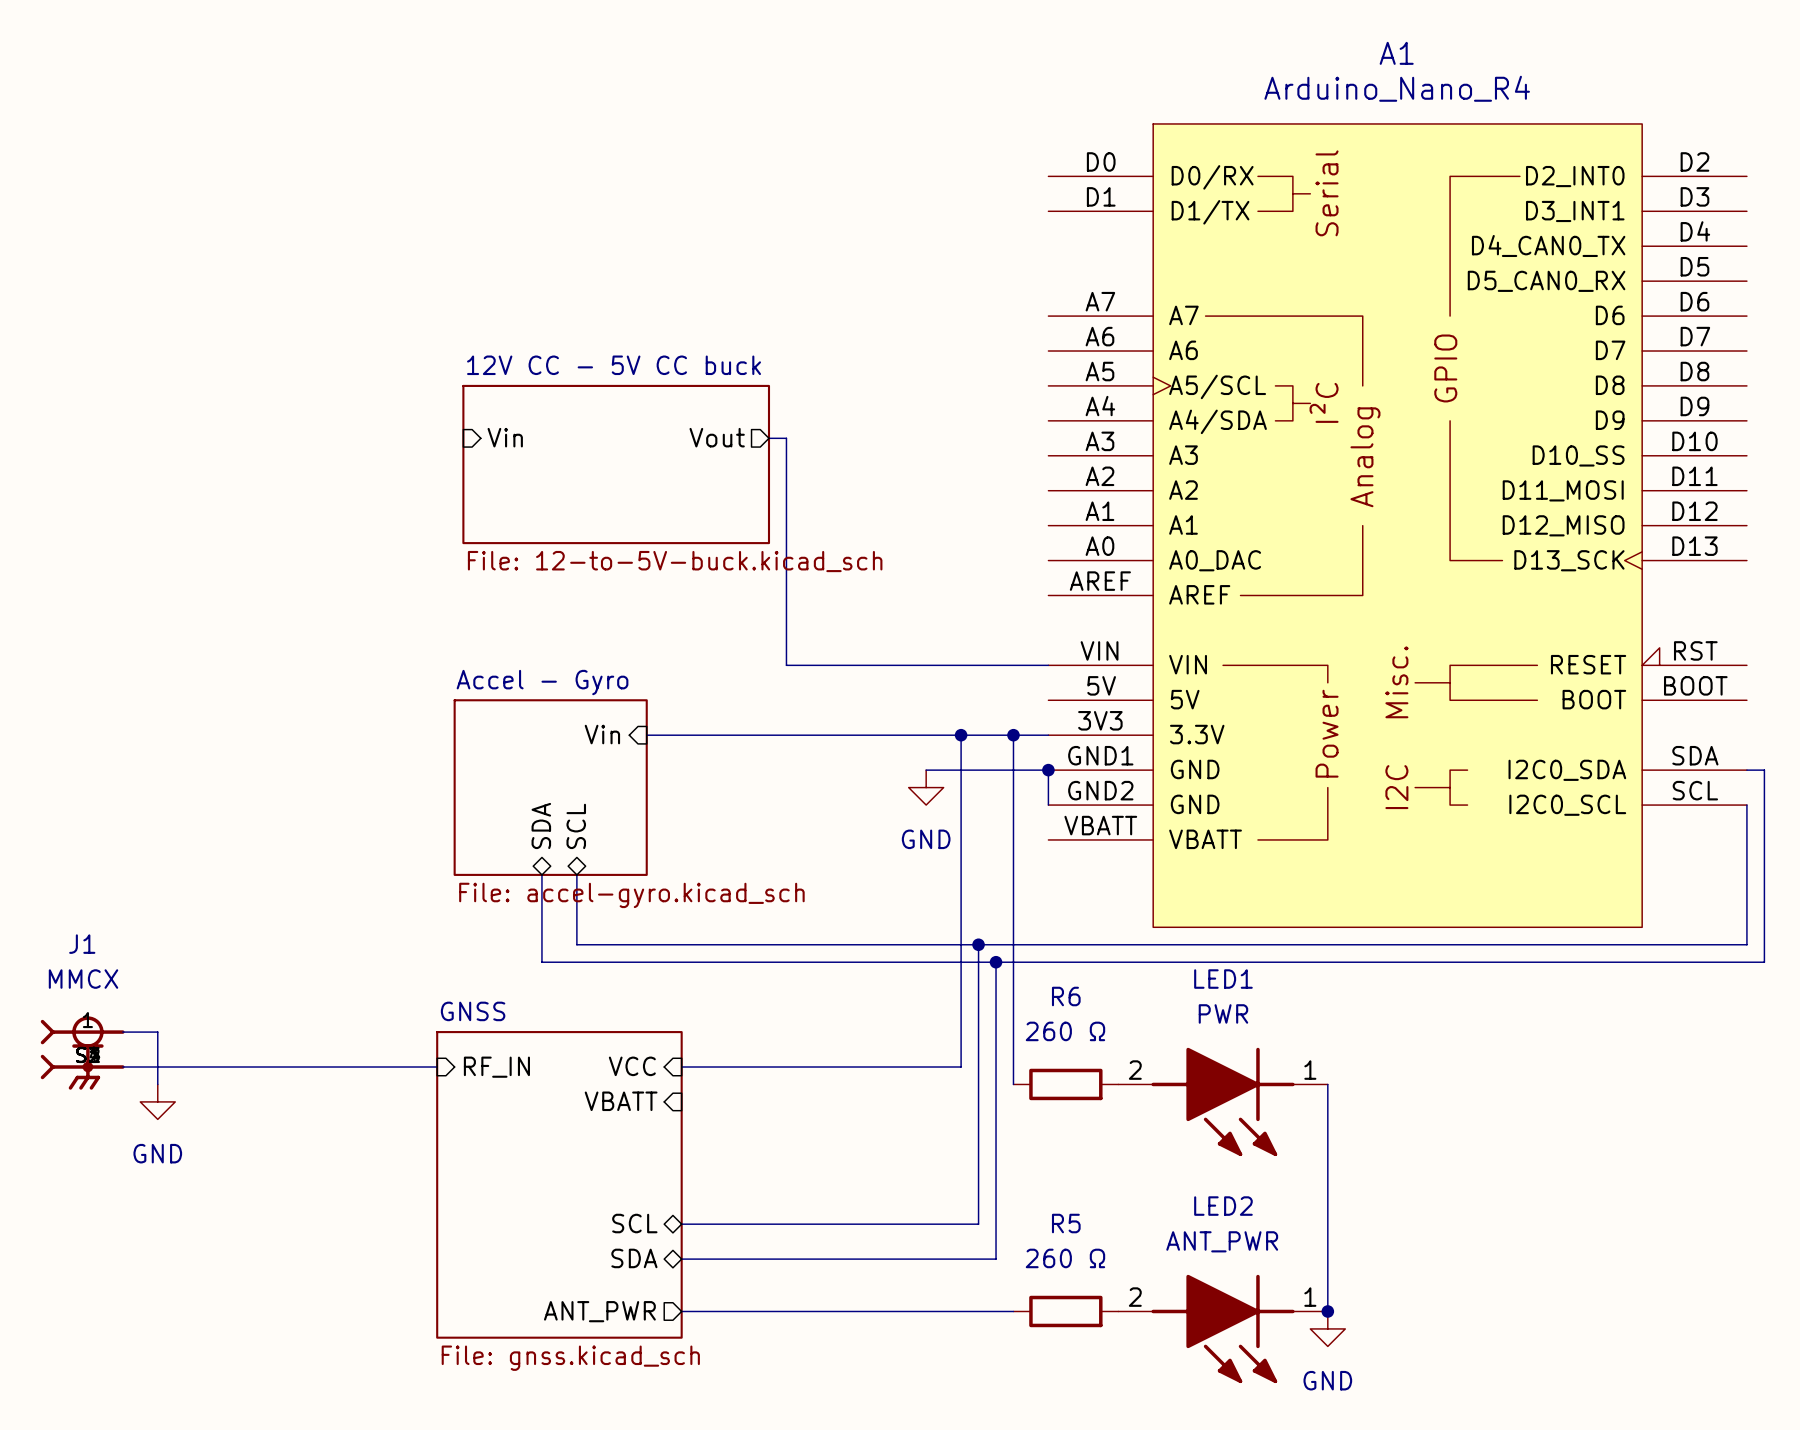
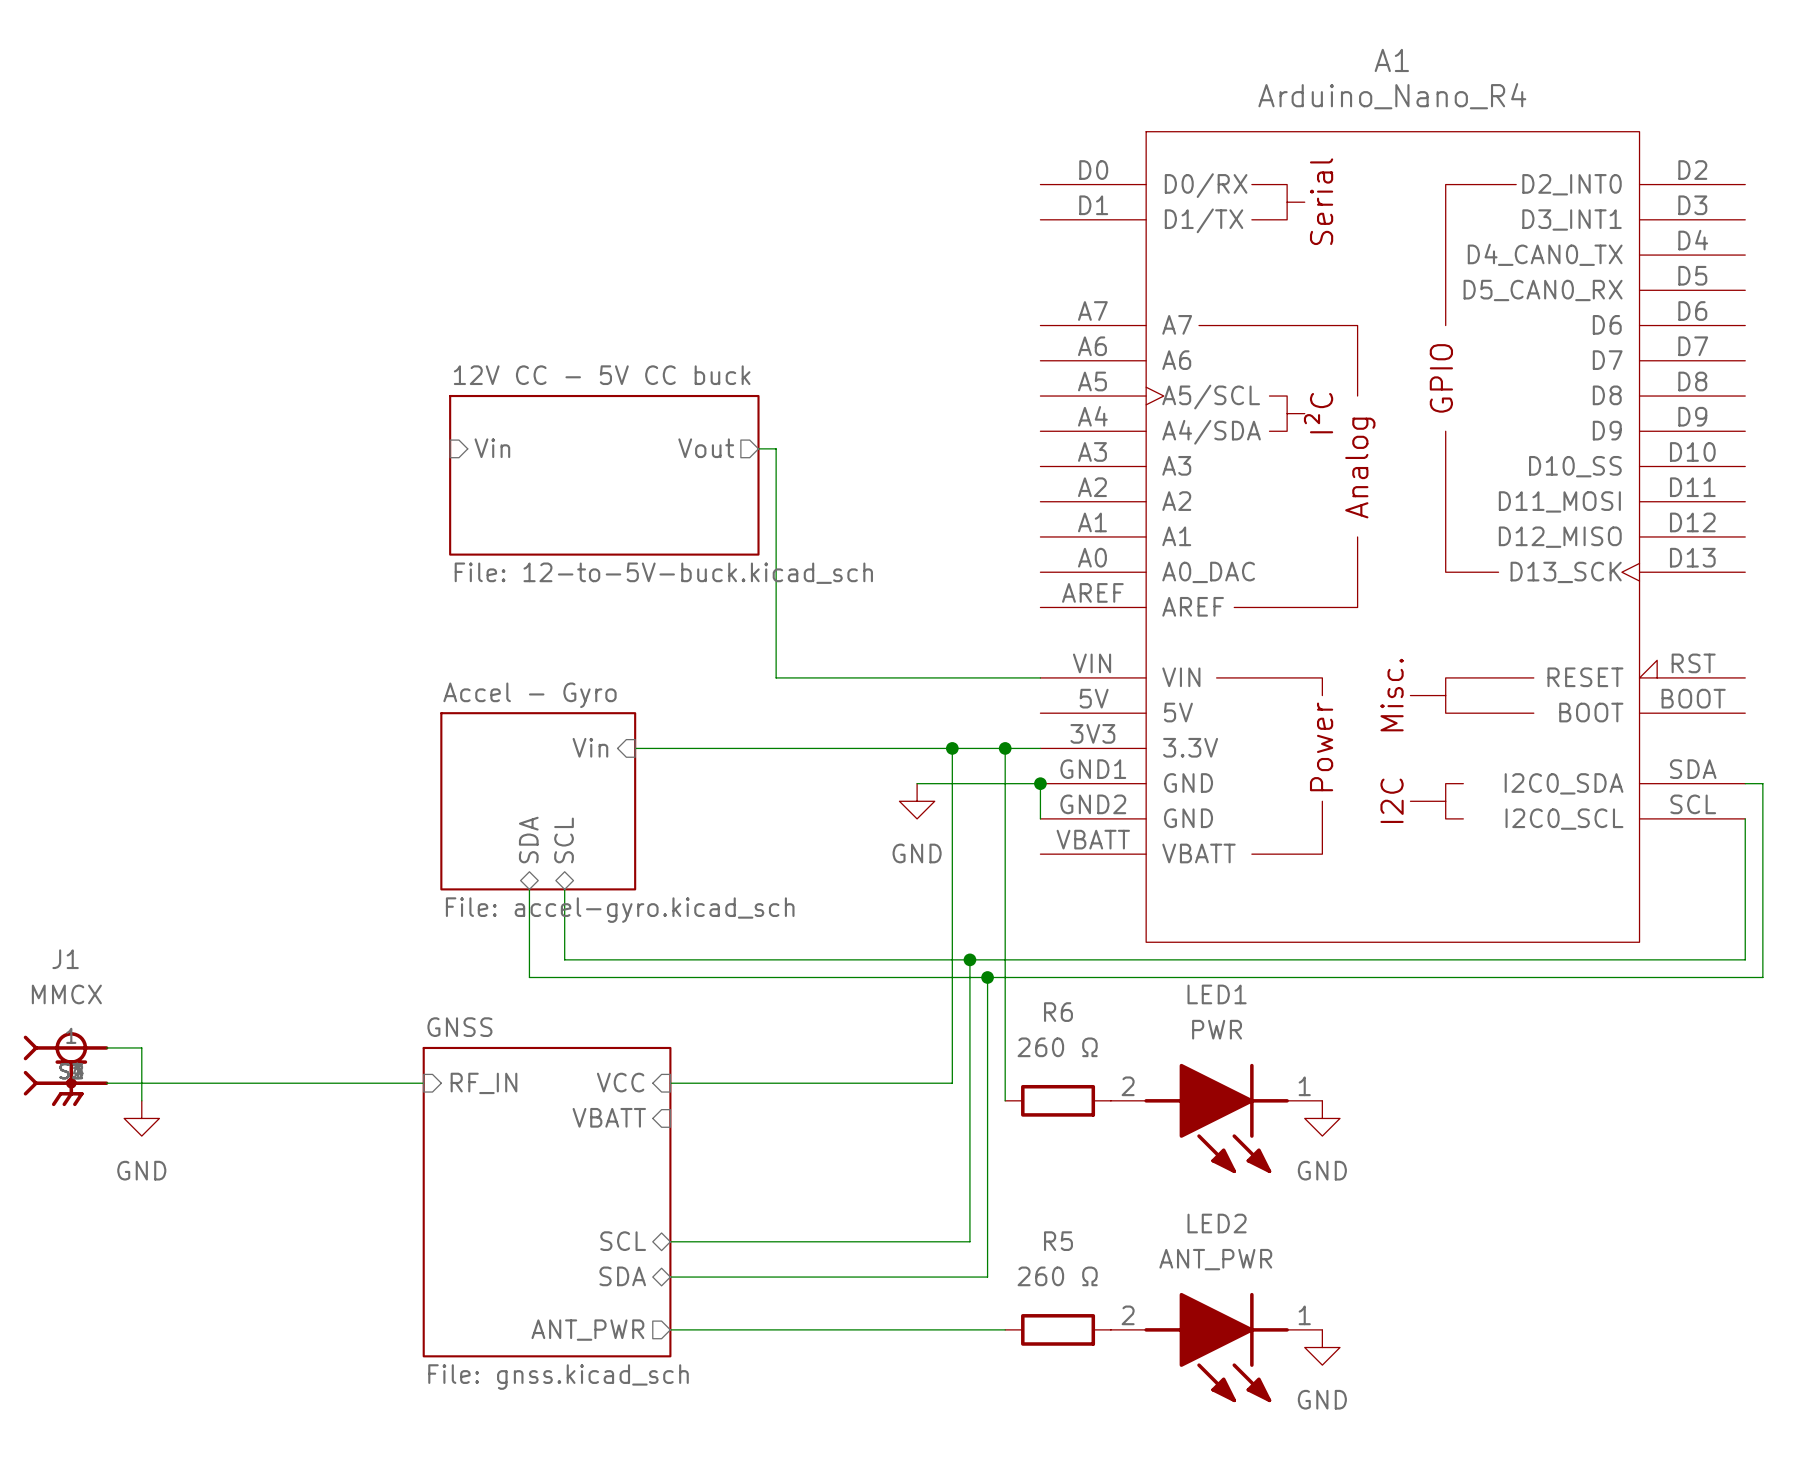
wire: (1327, 1084) (1327, 1311) -> none
power symbol: none -> GND (1322, 1118)
junction: (1327, 1311) -> none

